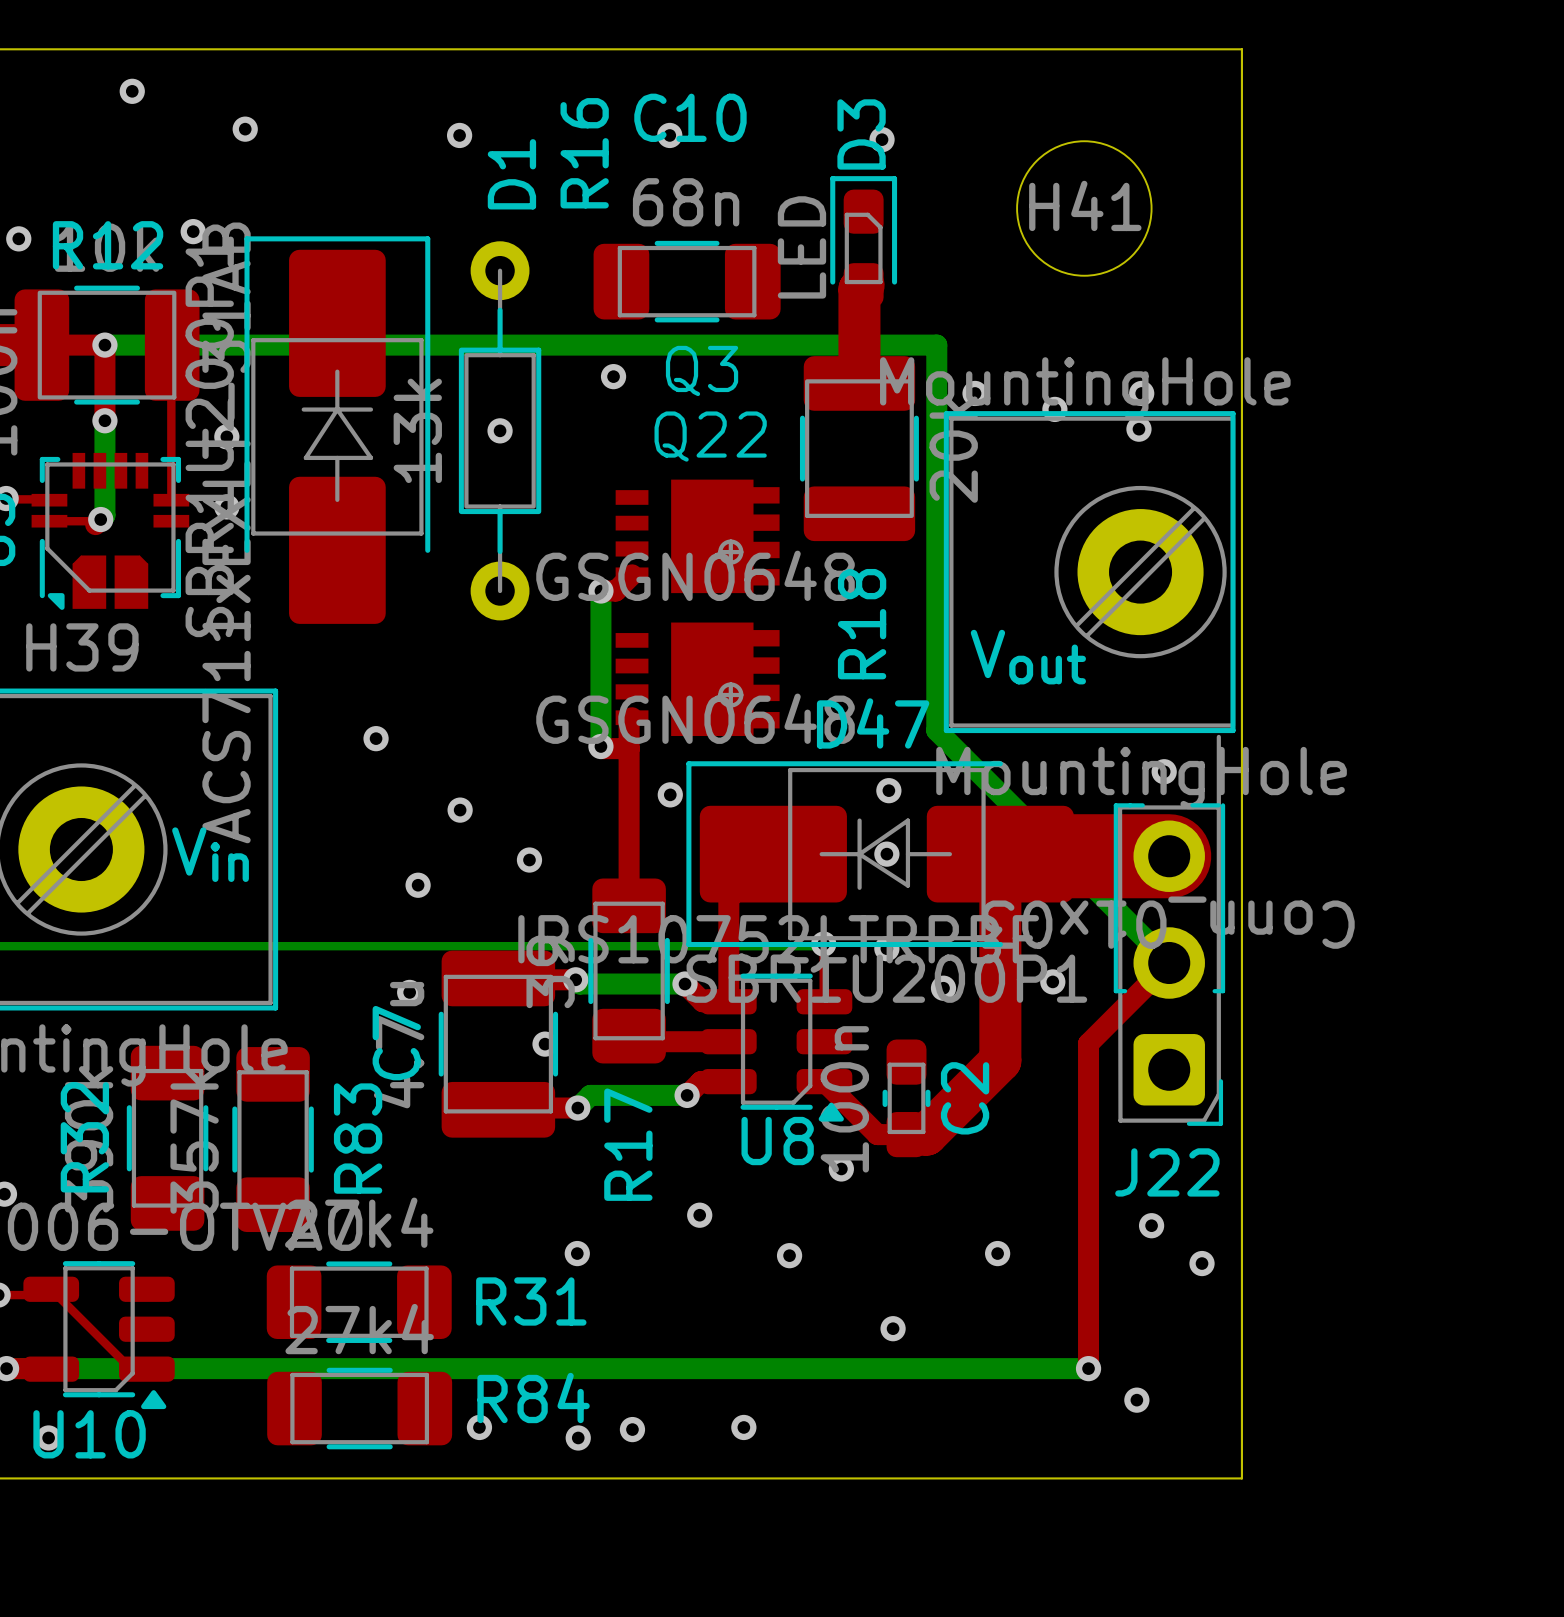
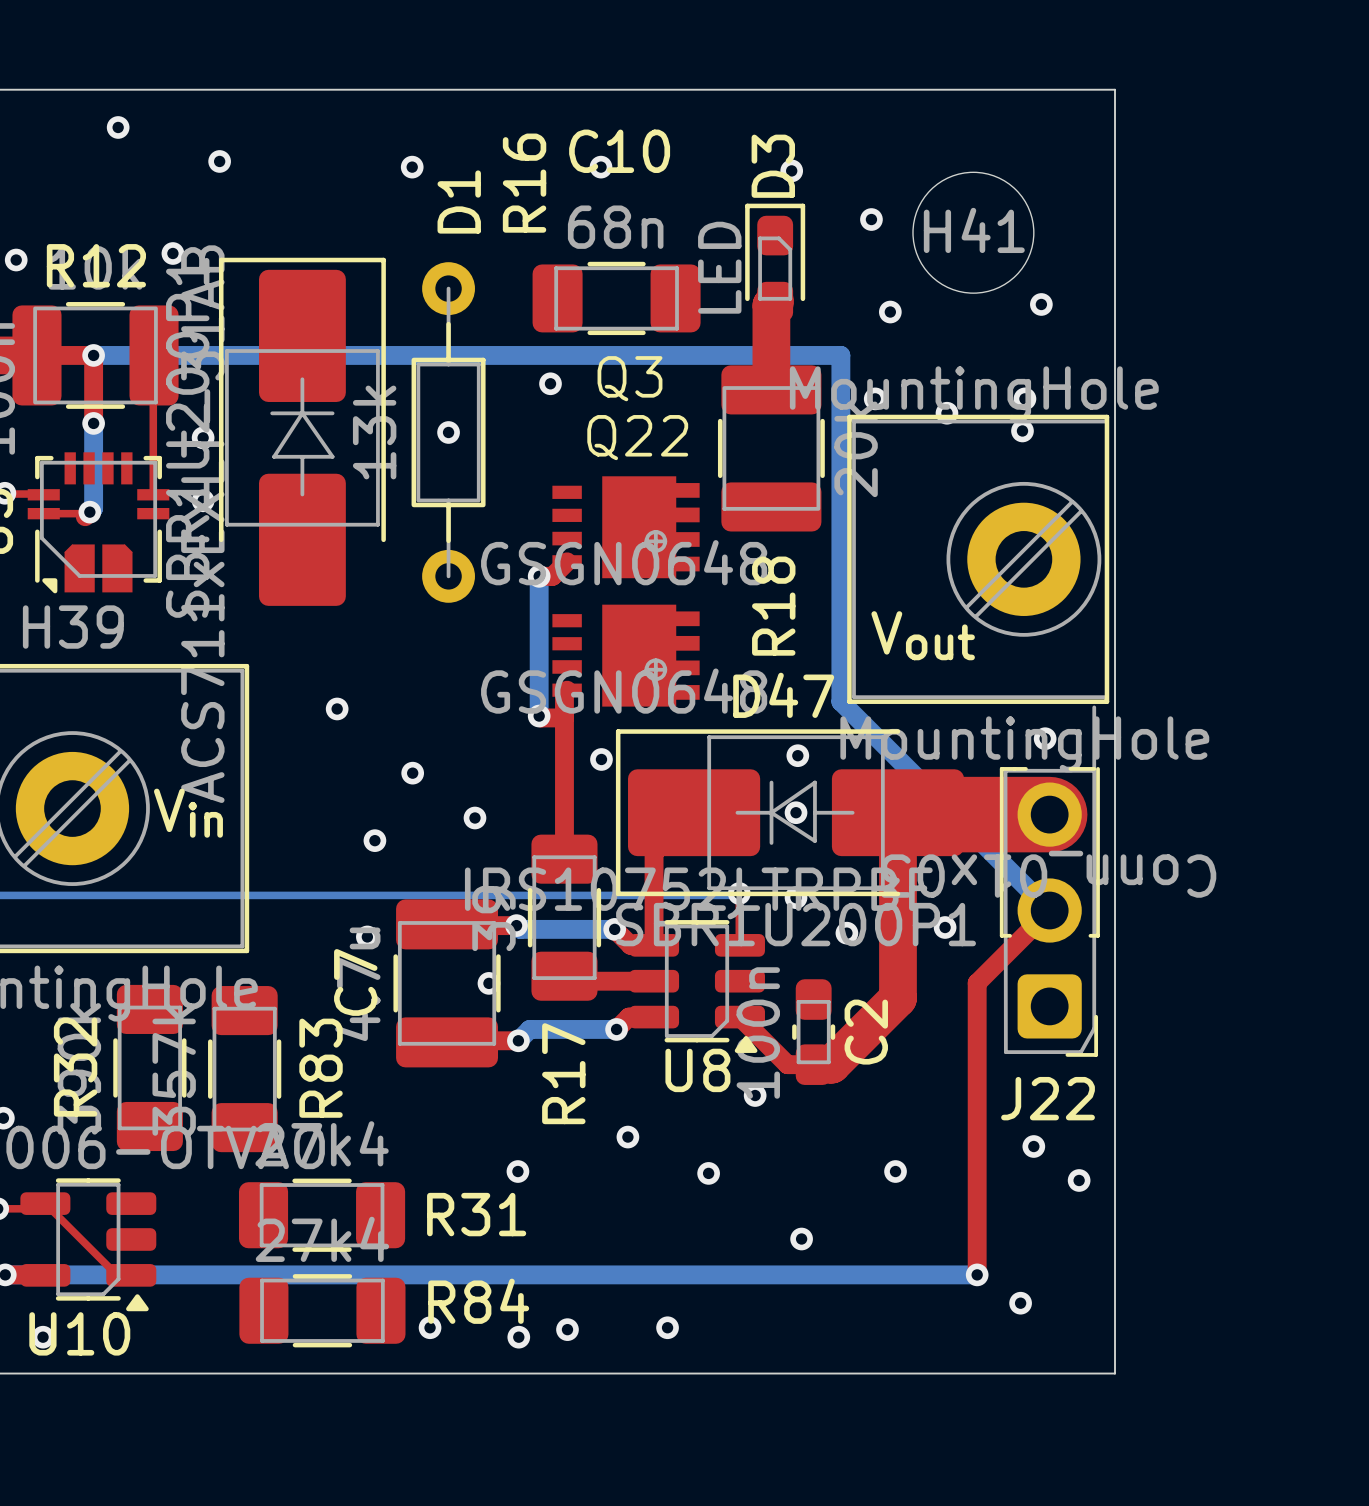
via: none -> (871, 219)
via: none -> (1041, 304)
via: none -> (890, 312)

